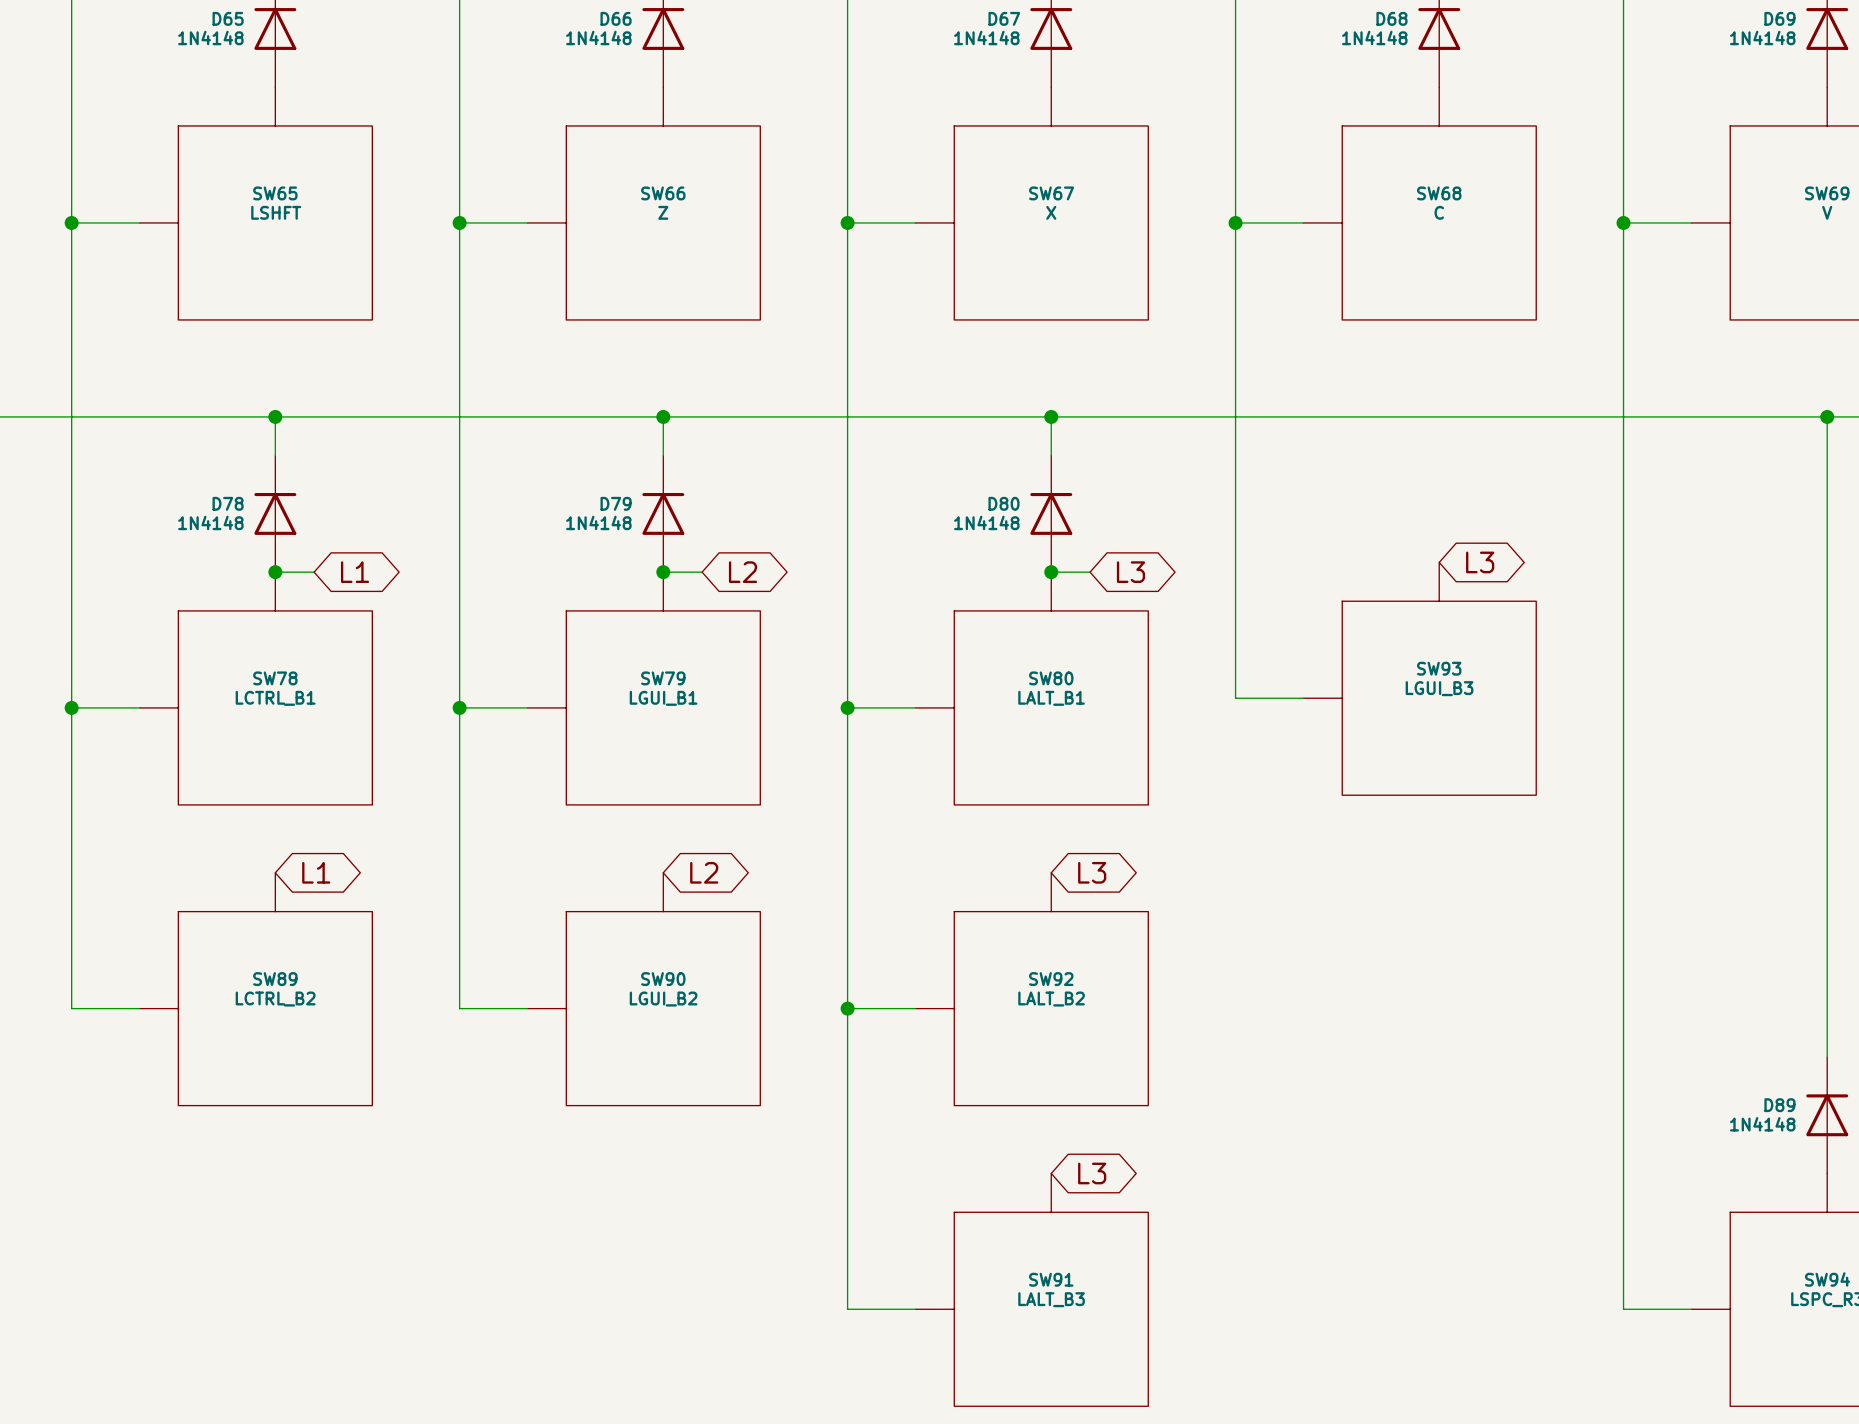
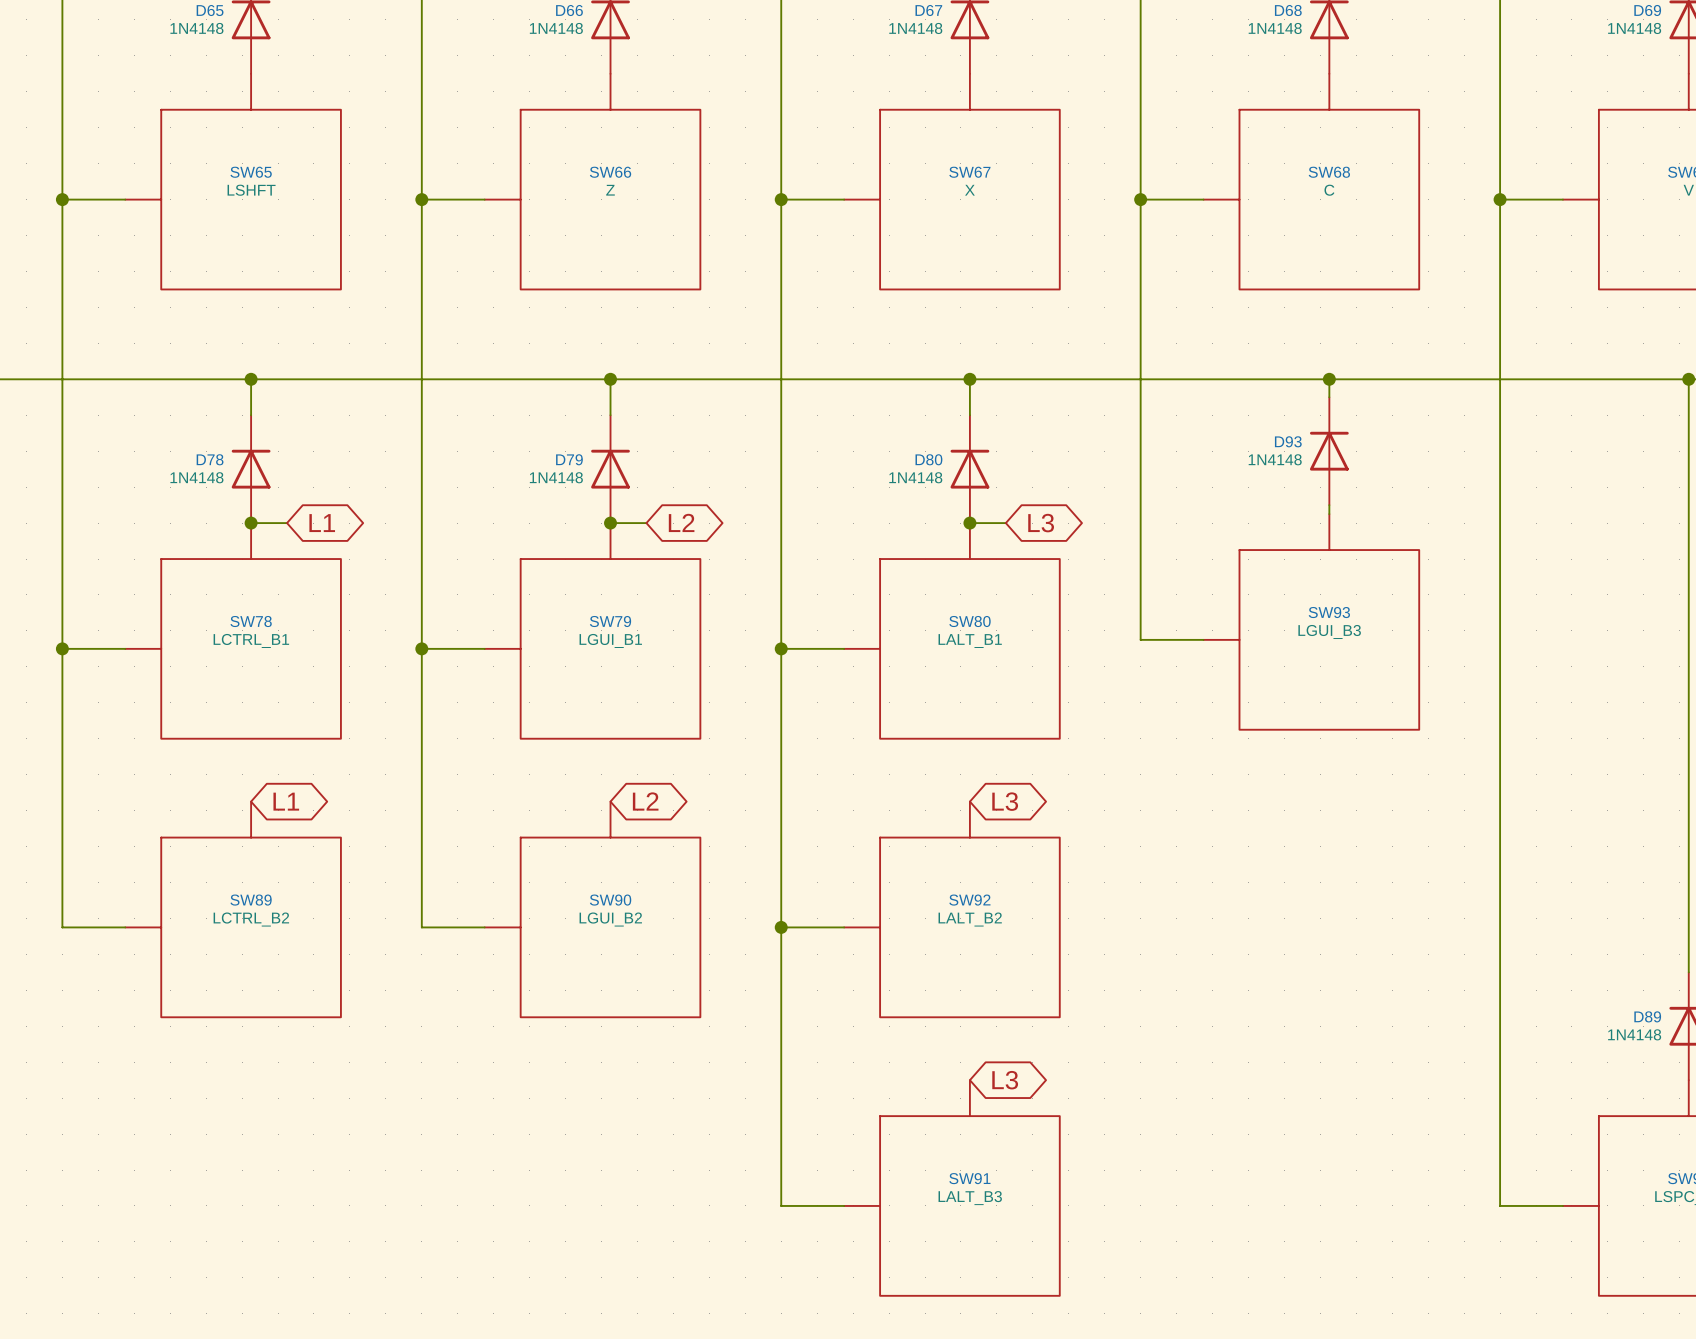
wire: none -> (1329, 379) (1329, 397)
junction: none -> (1329, 379)
D93: none -> 1N4148 (1329, 451)
wire: none -> (1329, 505) (1329, 514)
global label: L3 (1480, 562) -> none

